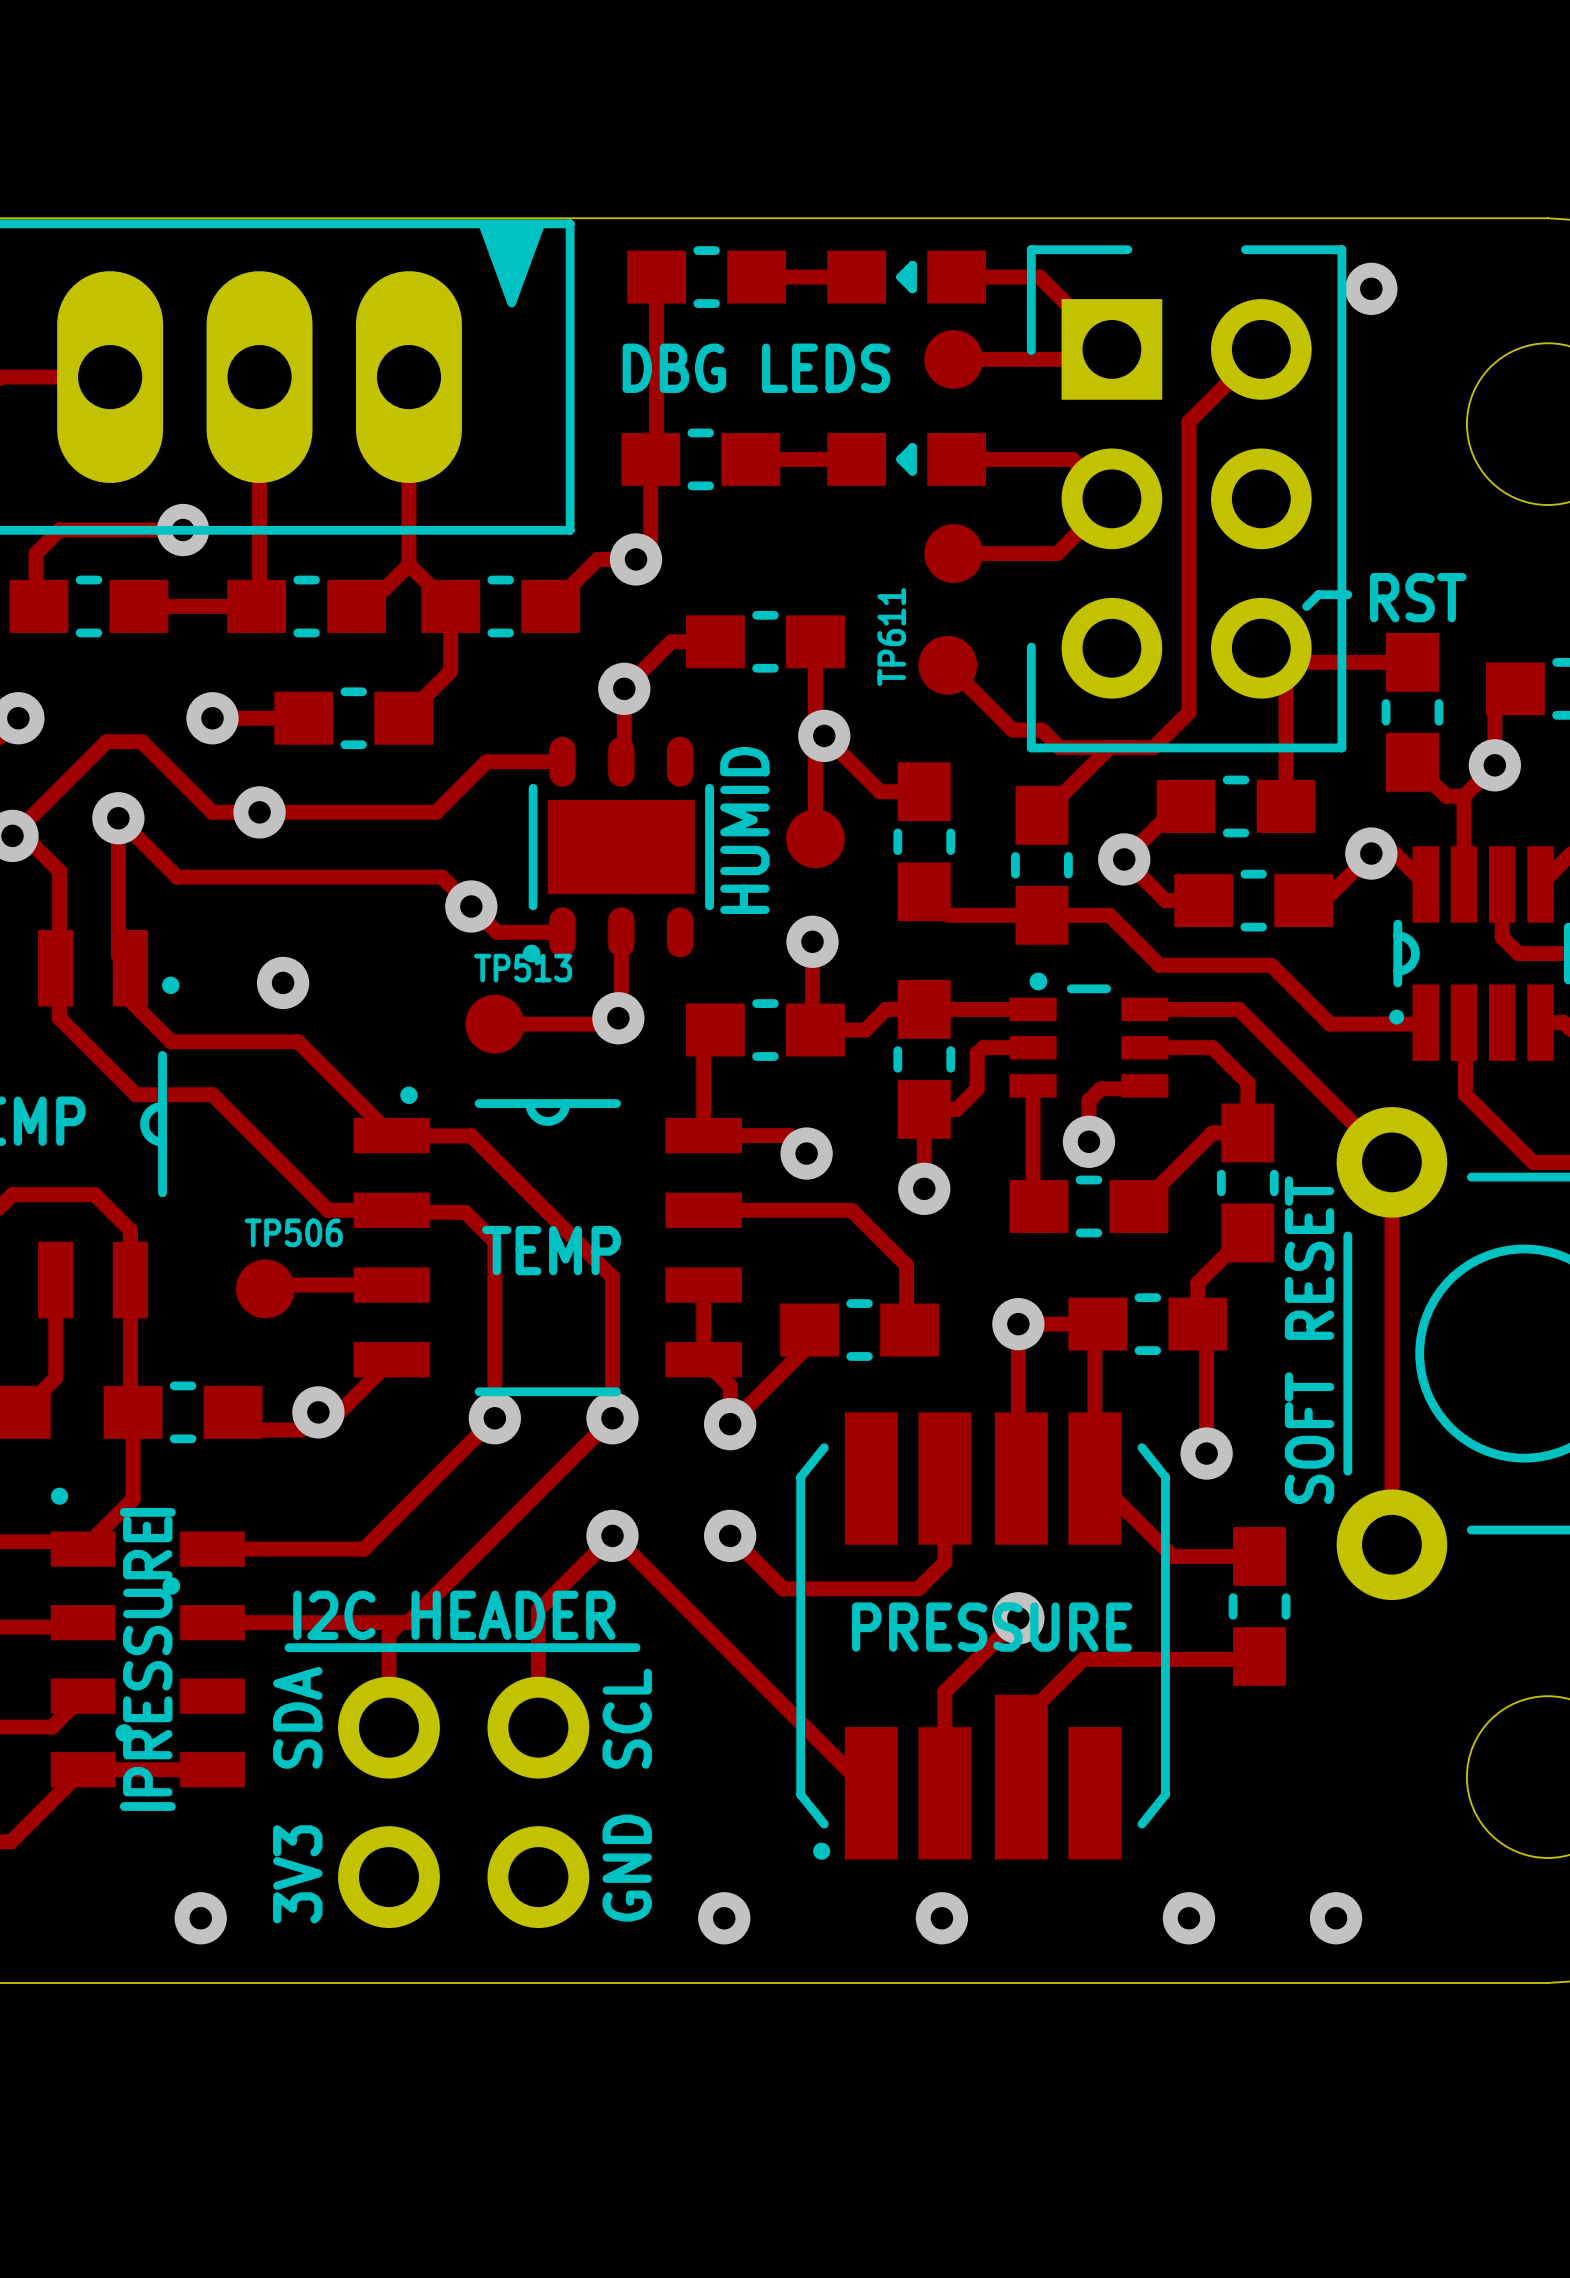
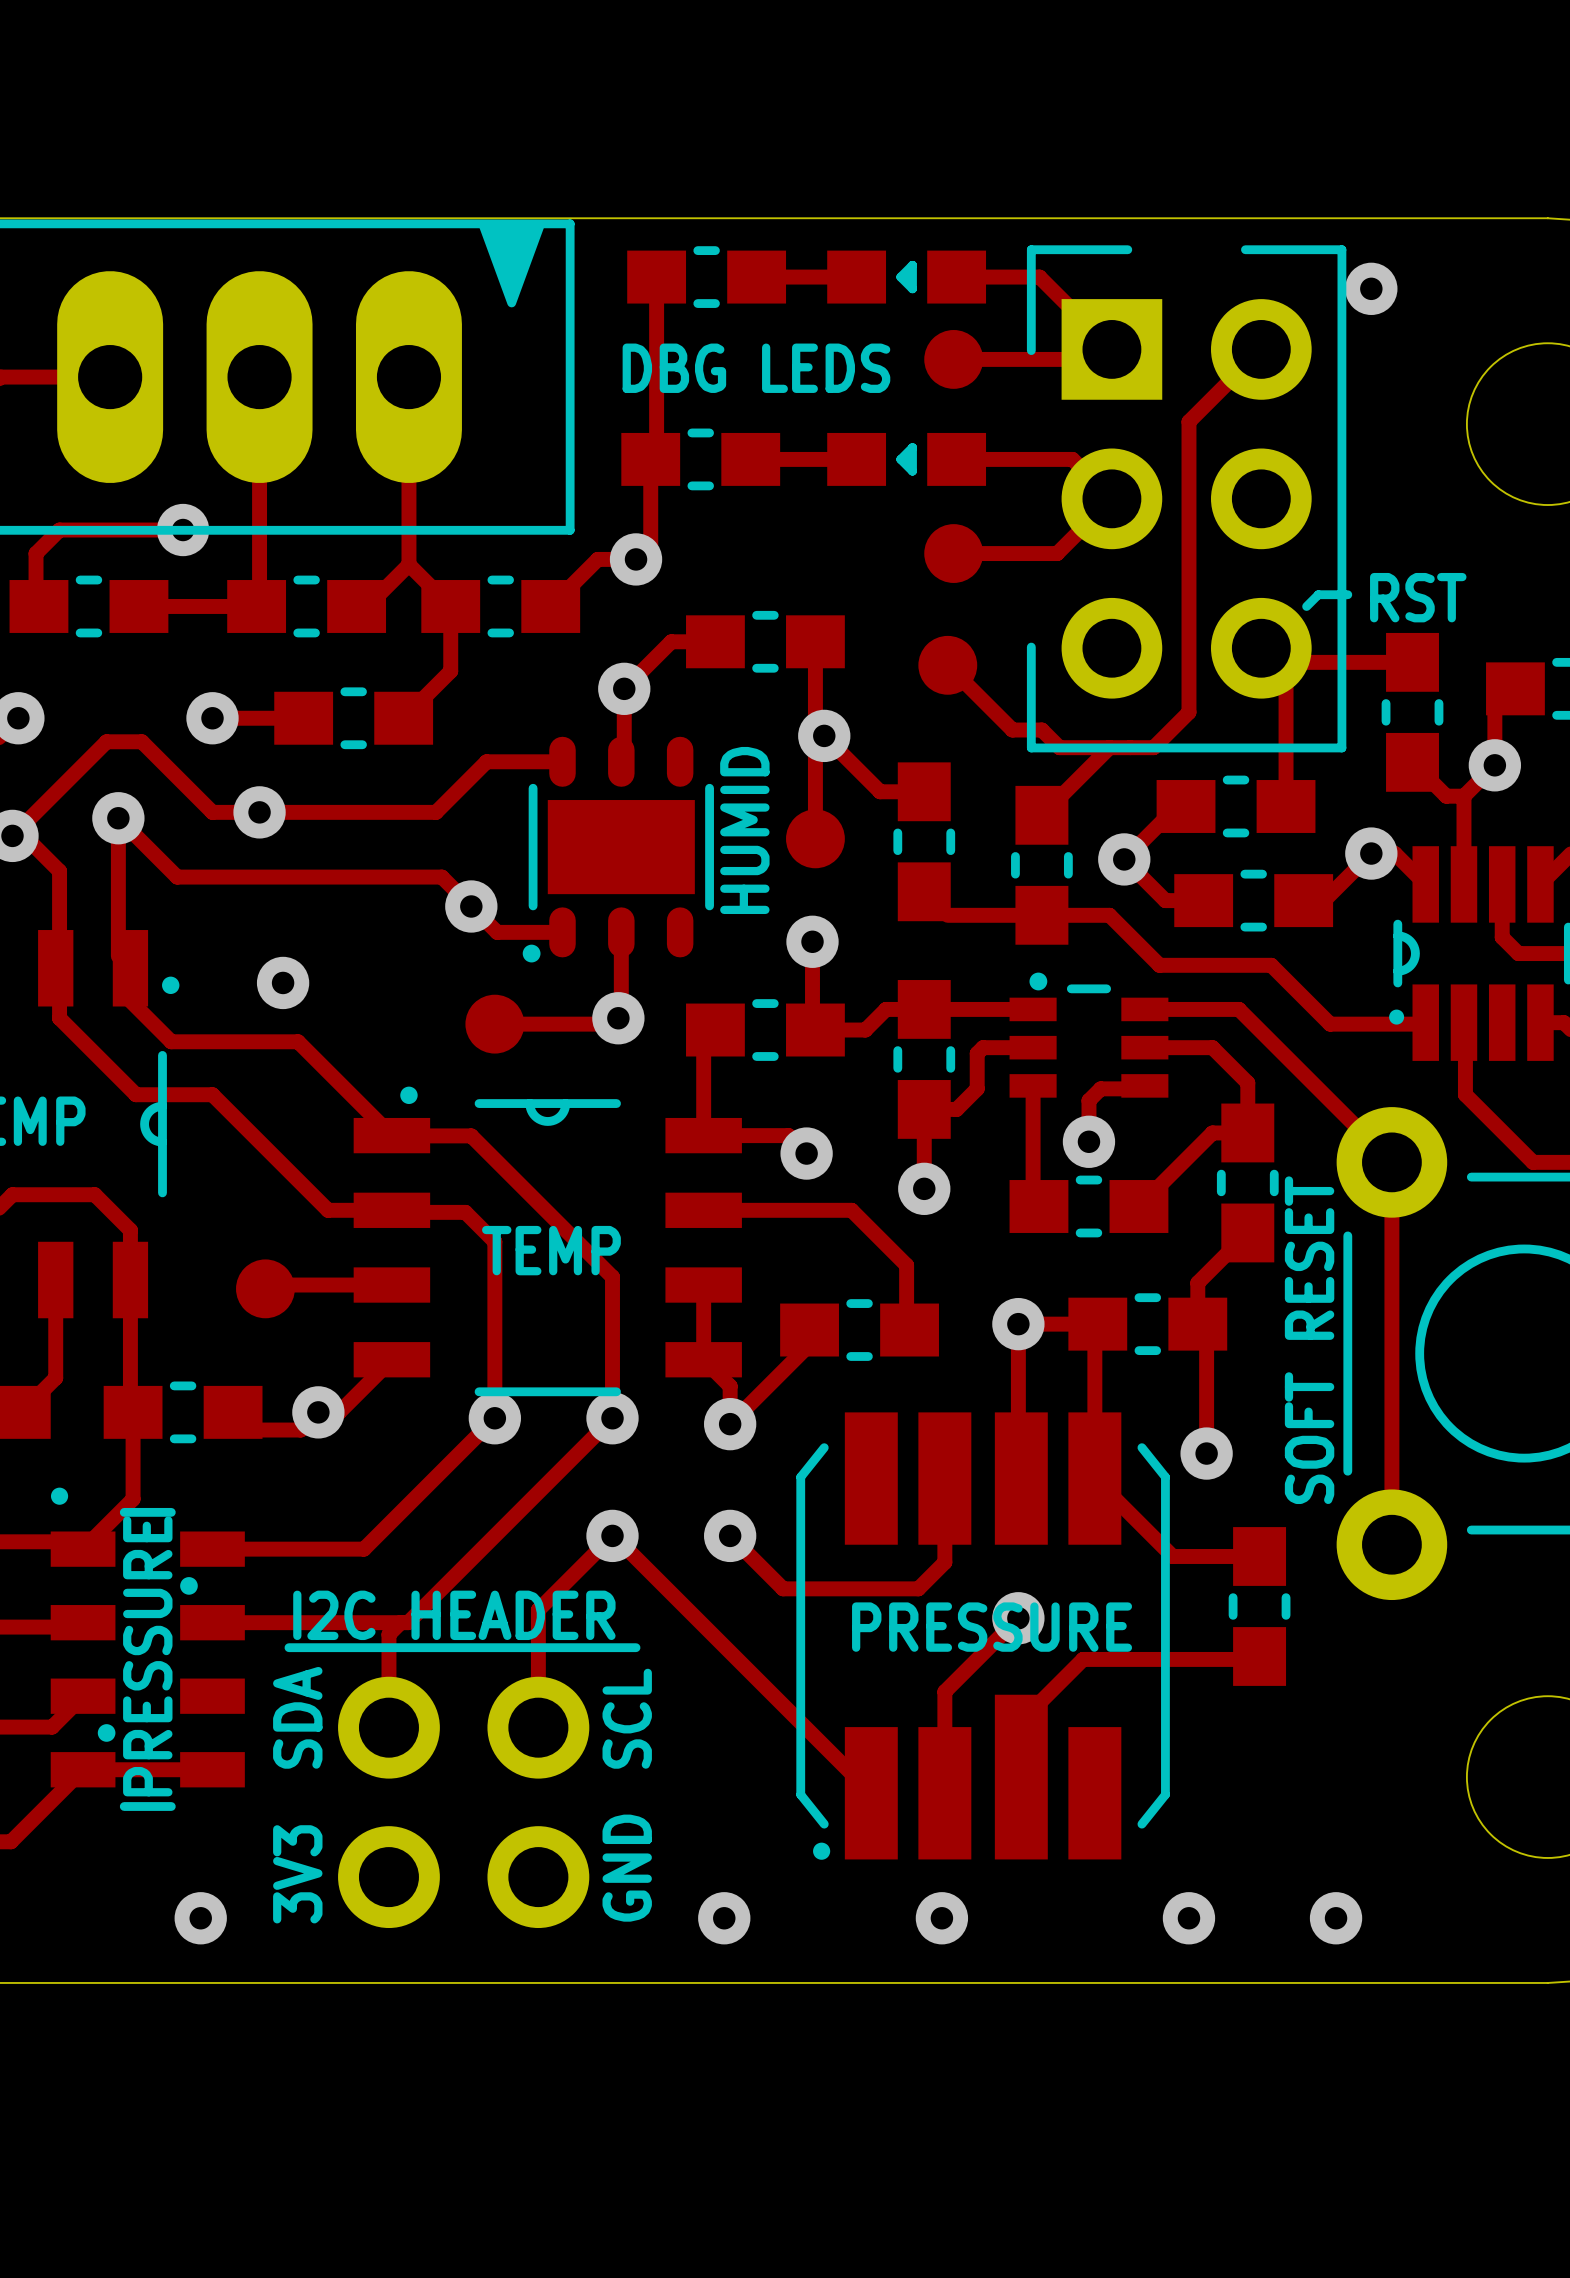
TP611 name: TP611 (891, 637) -> none
TP513 name: TP513 (523, 968) -> none
TP506 name: TP506 (293, 1232) -> none
part footprint: [50, 1487, 245, 1811] -> [50, 1487, 245, 1811]

